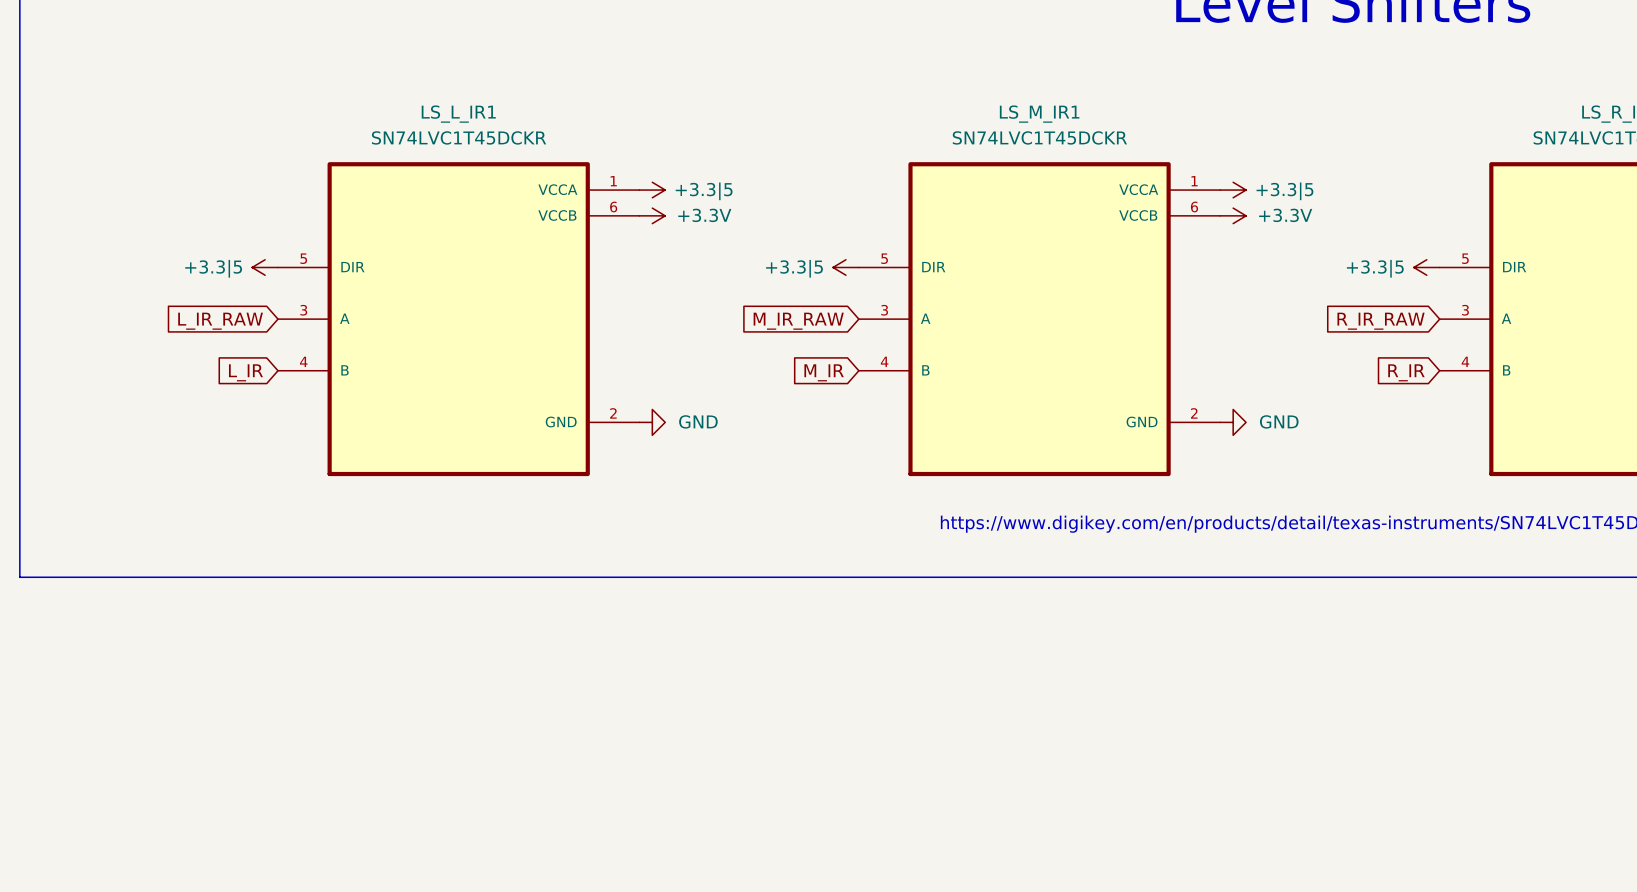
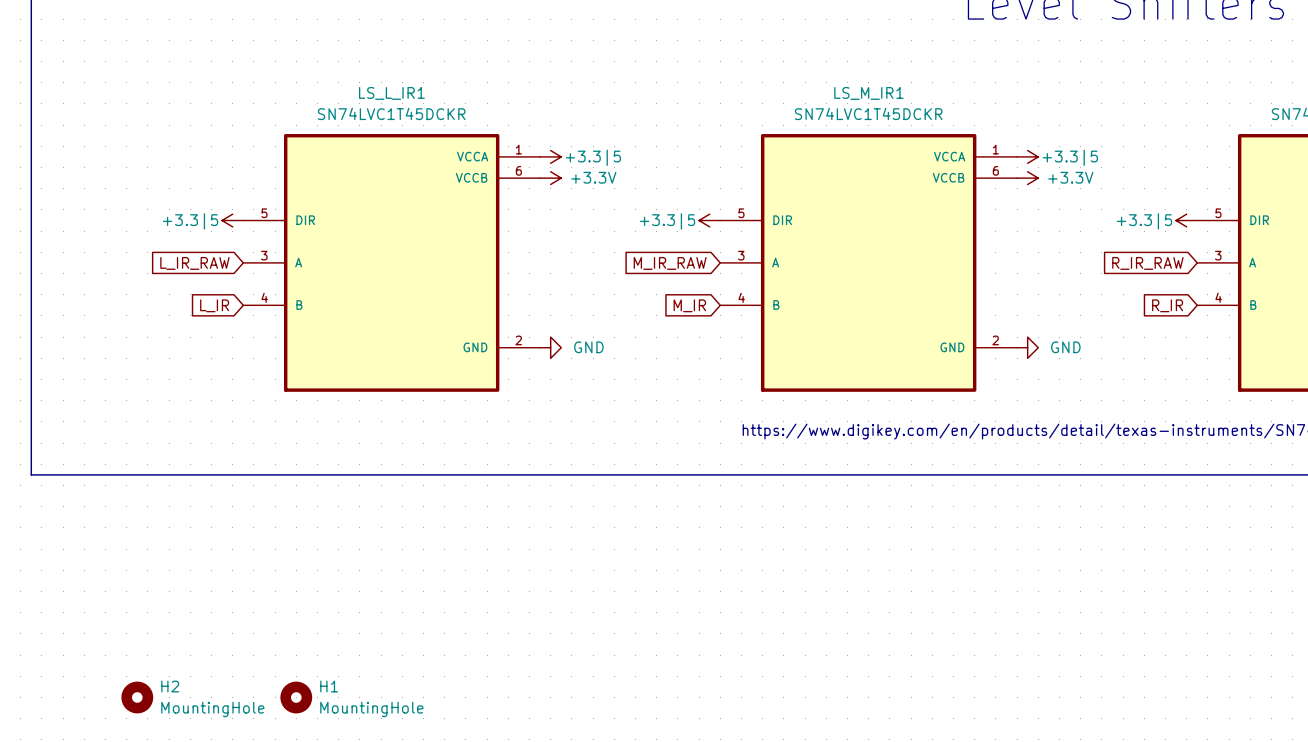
H2: none -> MountingHole (137, 697)
H1: none -> MountingHole (296, 697)

